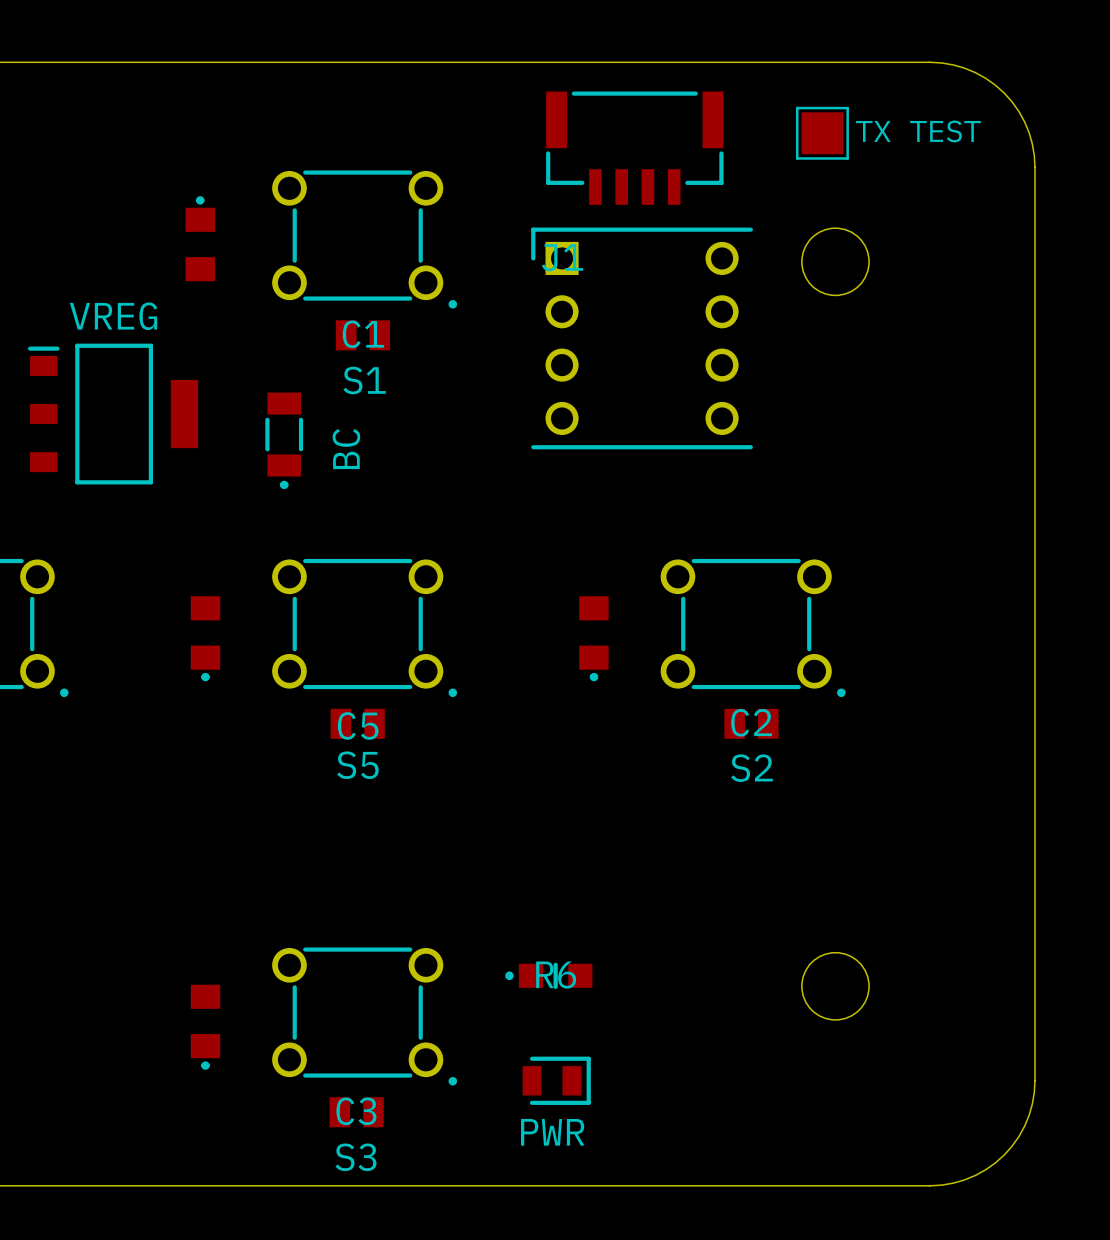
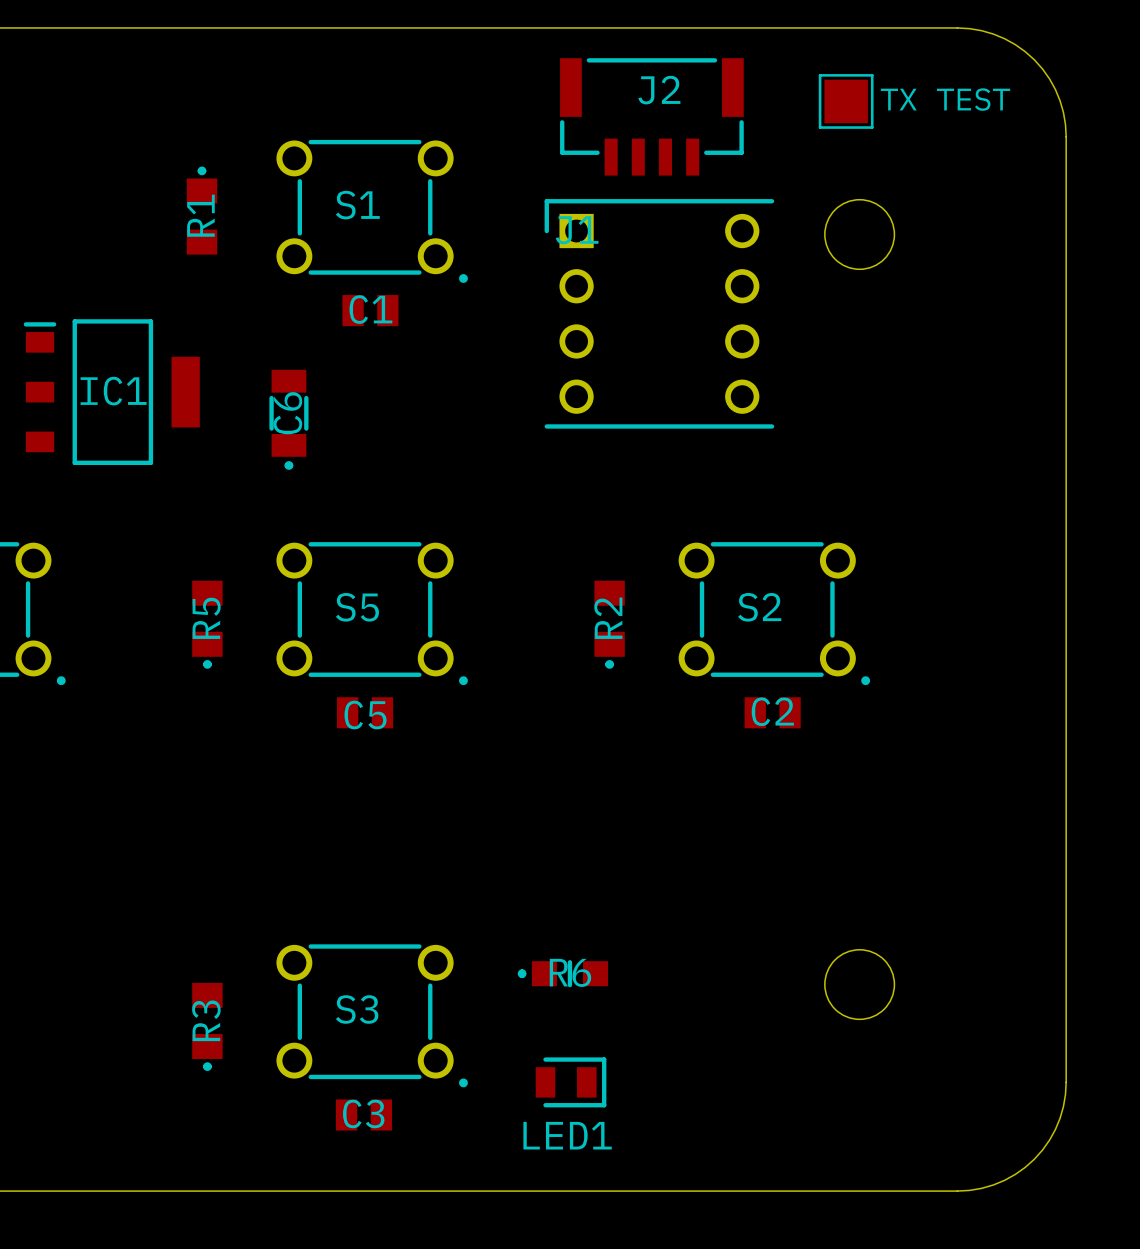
J2 name: none -> J2 (659, 90)
R1 name: none -> R1 (200, 215)
VREG name: VREG (113, 316) -> IC1 (113, 391)
S1 name position: S1 (364, 380) -> S1 (357, 205)
BC name: BC (346, 449) -> C6 (287, 413)
R5 name: none -> R5 (206, 618)
R2 name: none -> R2 (608, 618)
S5 name position: S5 (357, 765) -> S5 (357, 607)
S2 name position: S2 (751, 768) -> S2 (759, 607)
R3 name: none -> R3 (206, 1020)
PWR name: PWR (552, 1132) -> LED1 (567, 1135)
S3 name position: S3 (355, 1157) -> S3 (357, 1009)

